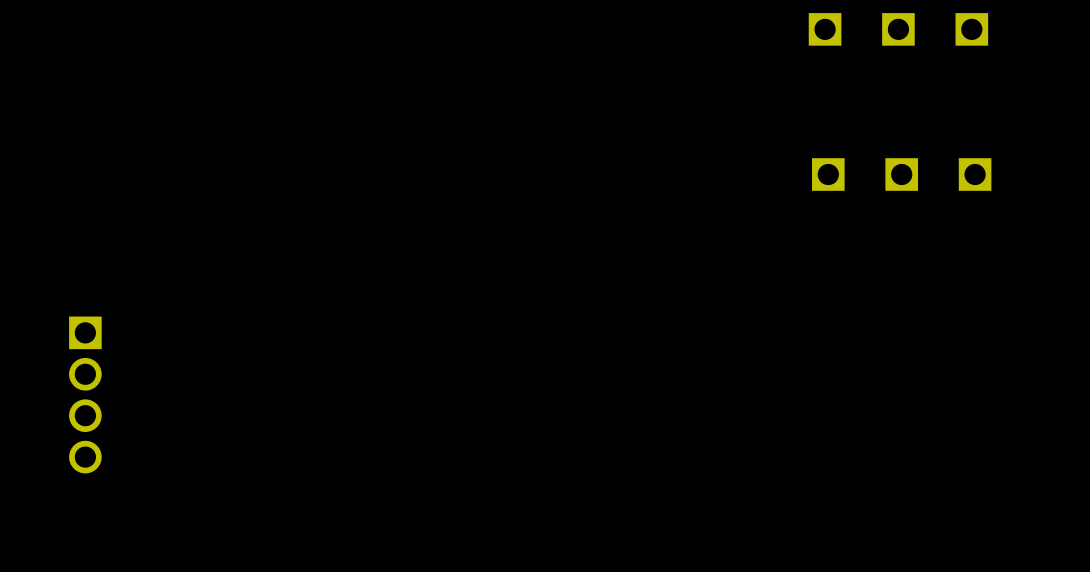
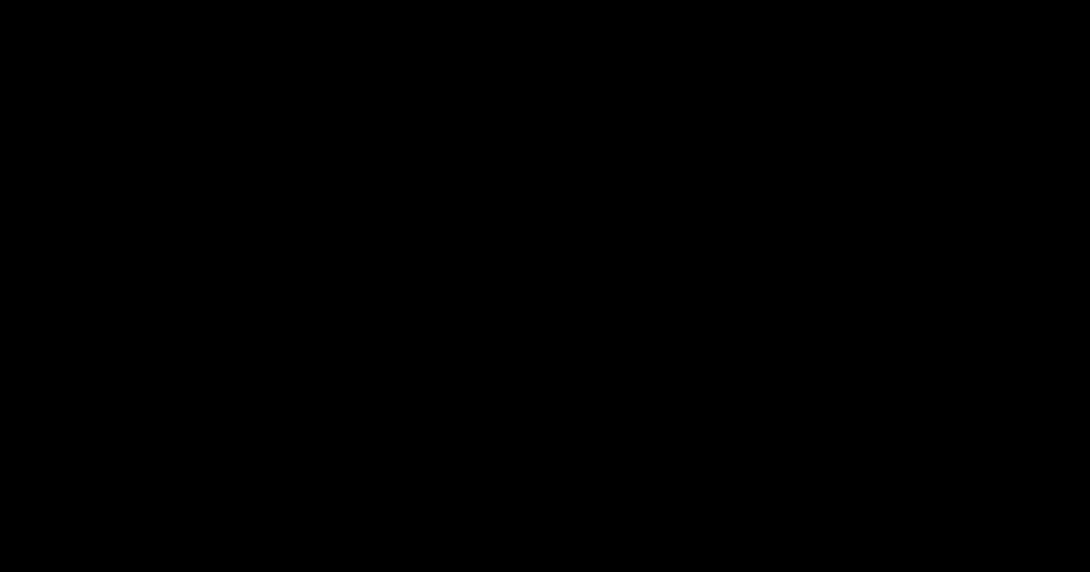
part: (825, 29) -> none
part: (898, 29) -> none
part: (971, 29) -> none
part: (828, 174) -> none
part: (901, 174) -> none
part: (975, 174) -> none
part: (85, 394) -> none

